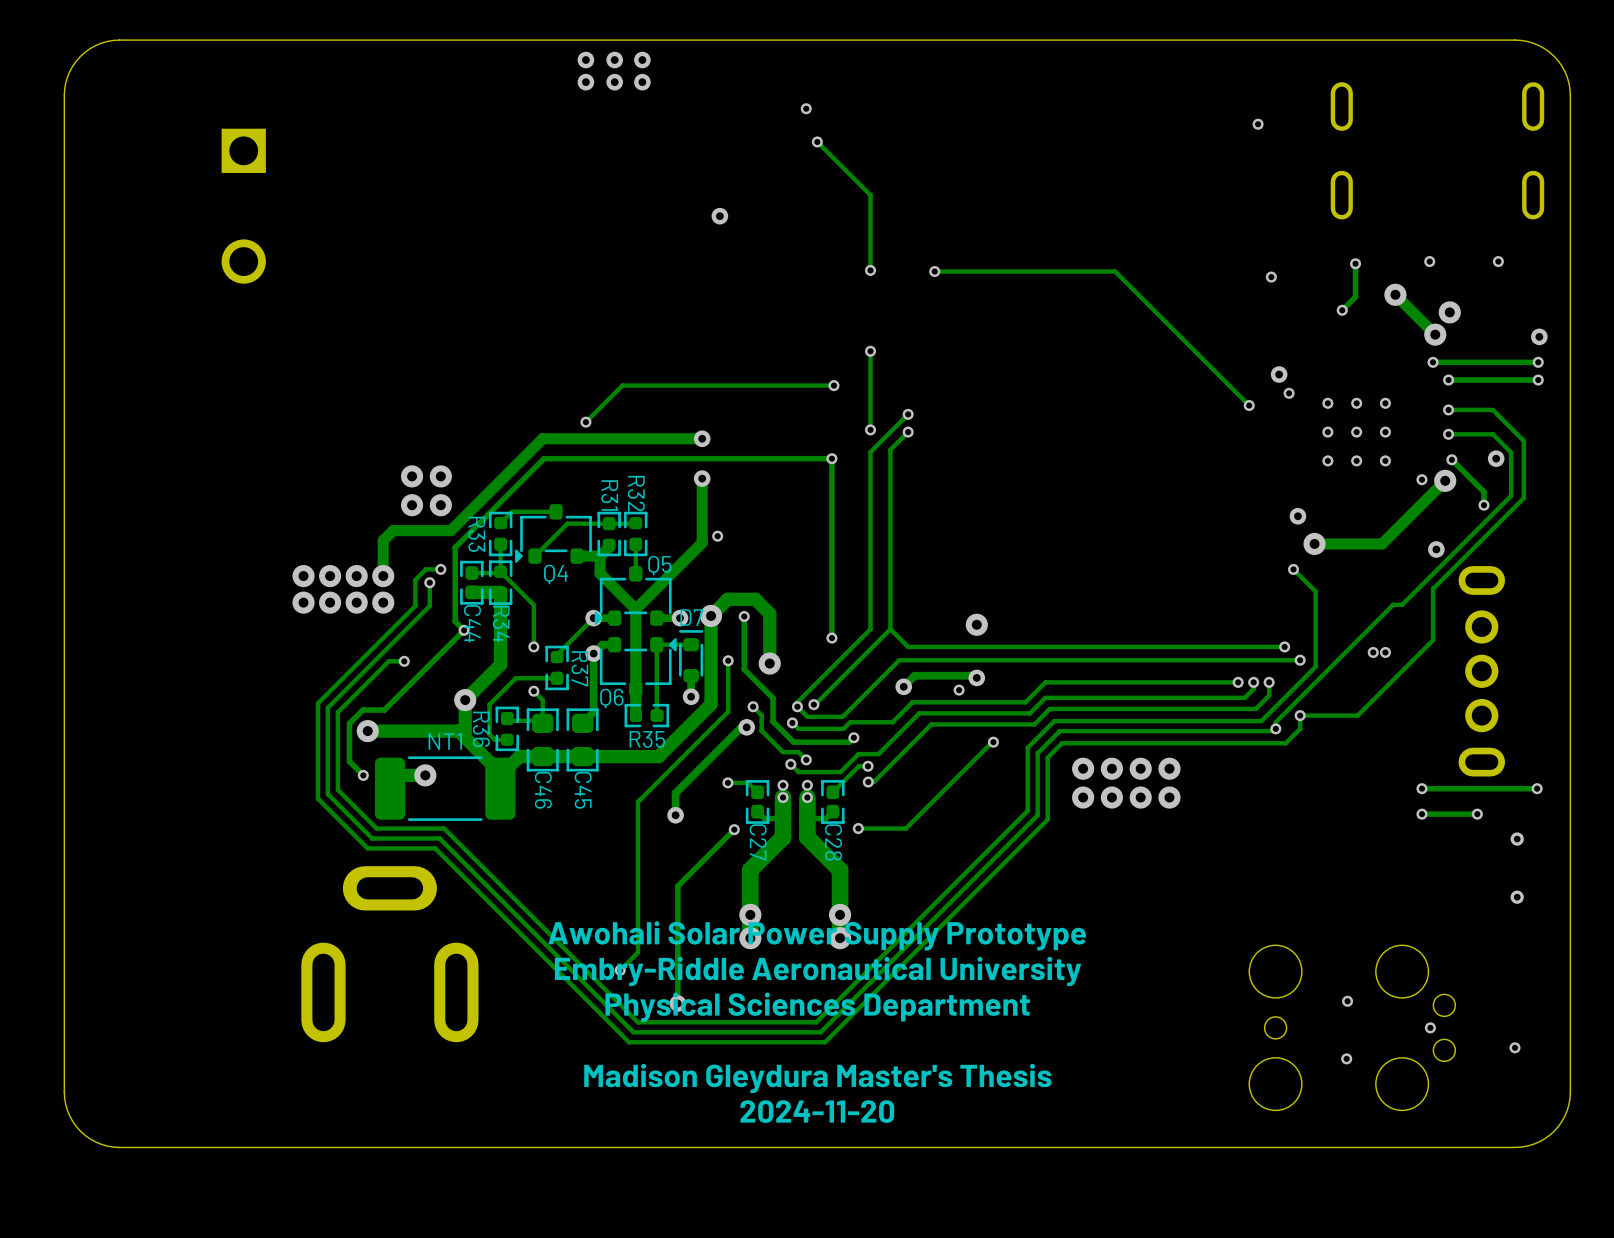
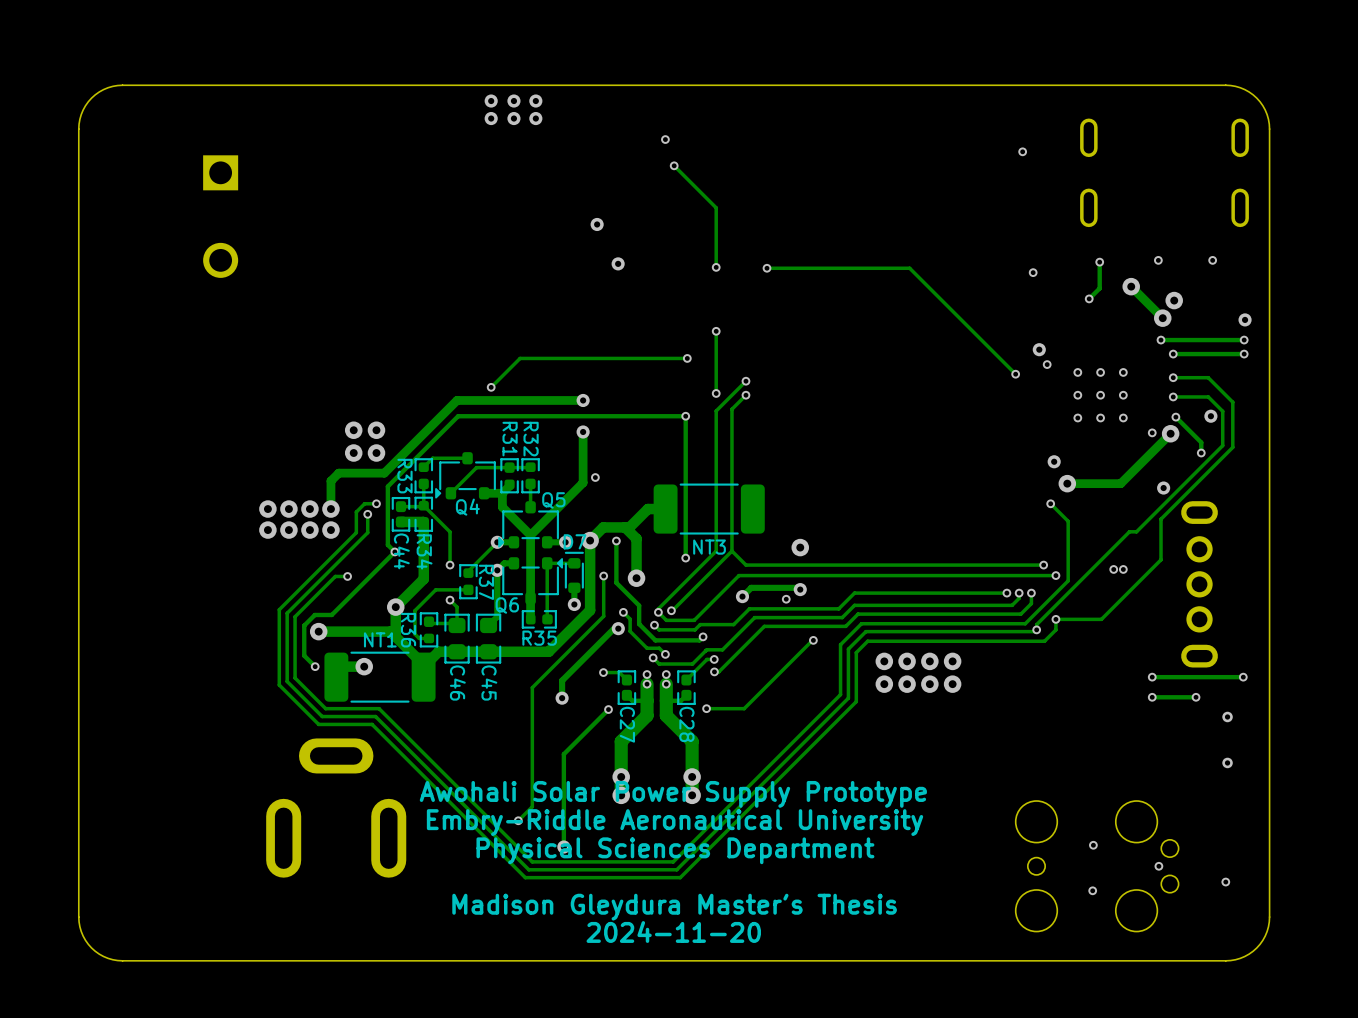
via: none -> (618, 263)
track: none -> (665, 509) (647, 509) (629, 527) (625, 527)
NT3: none -> (709, 509)

